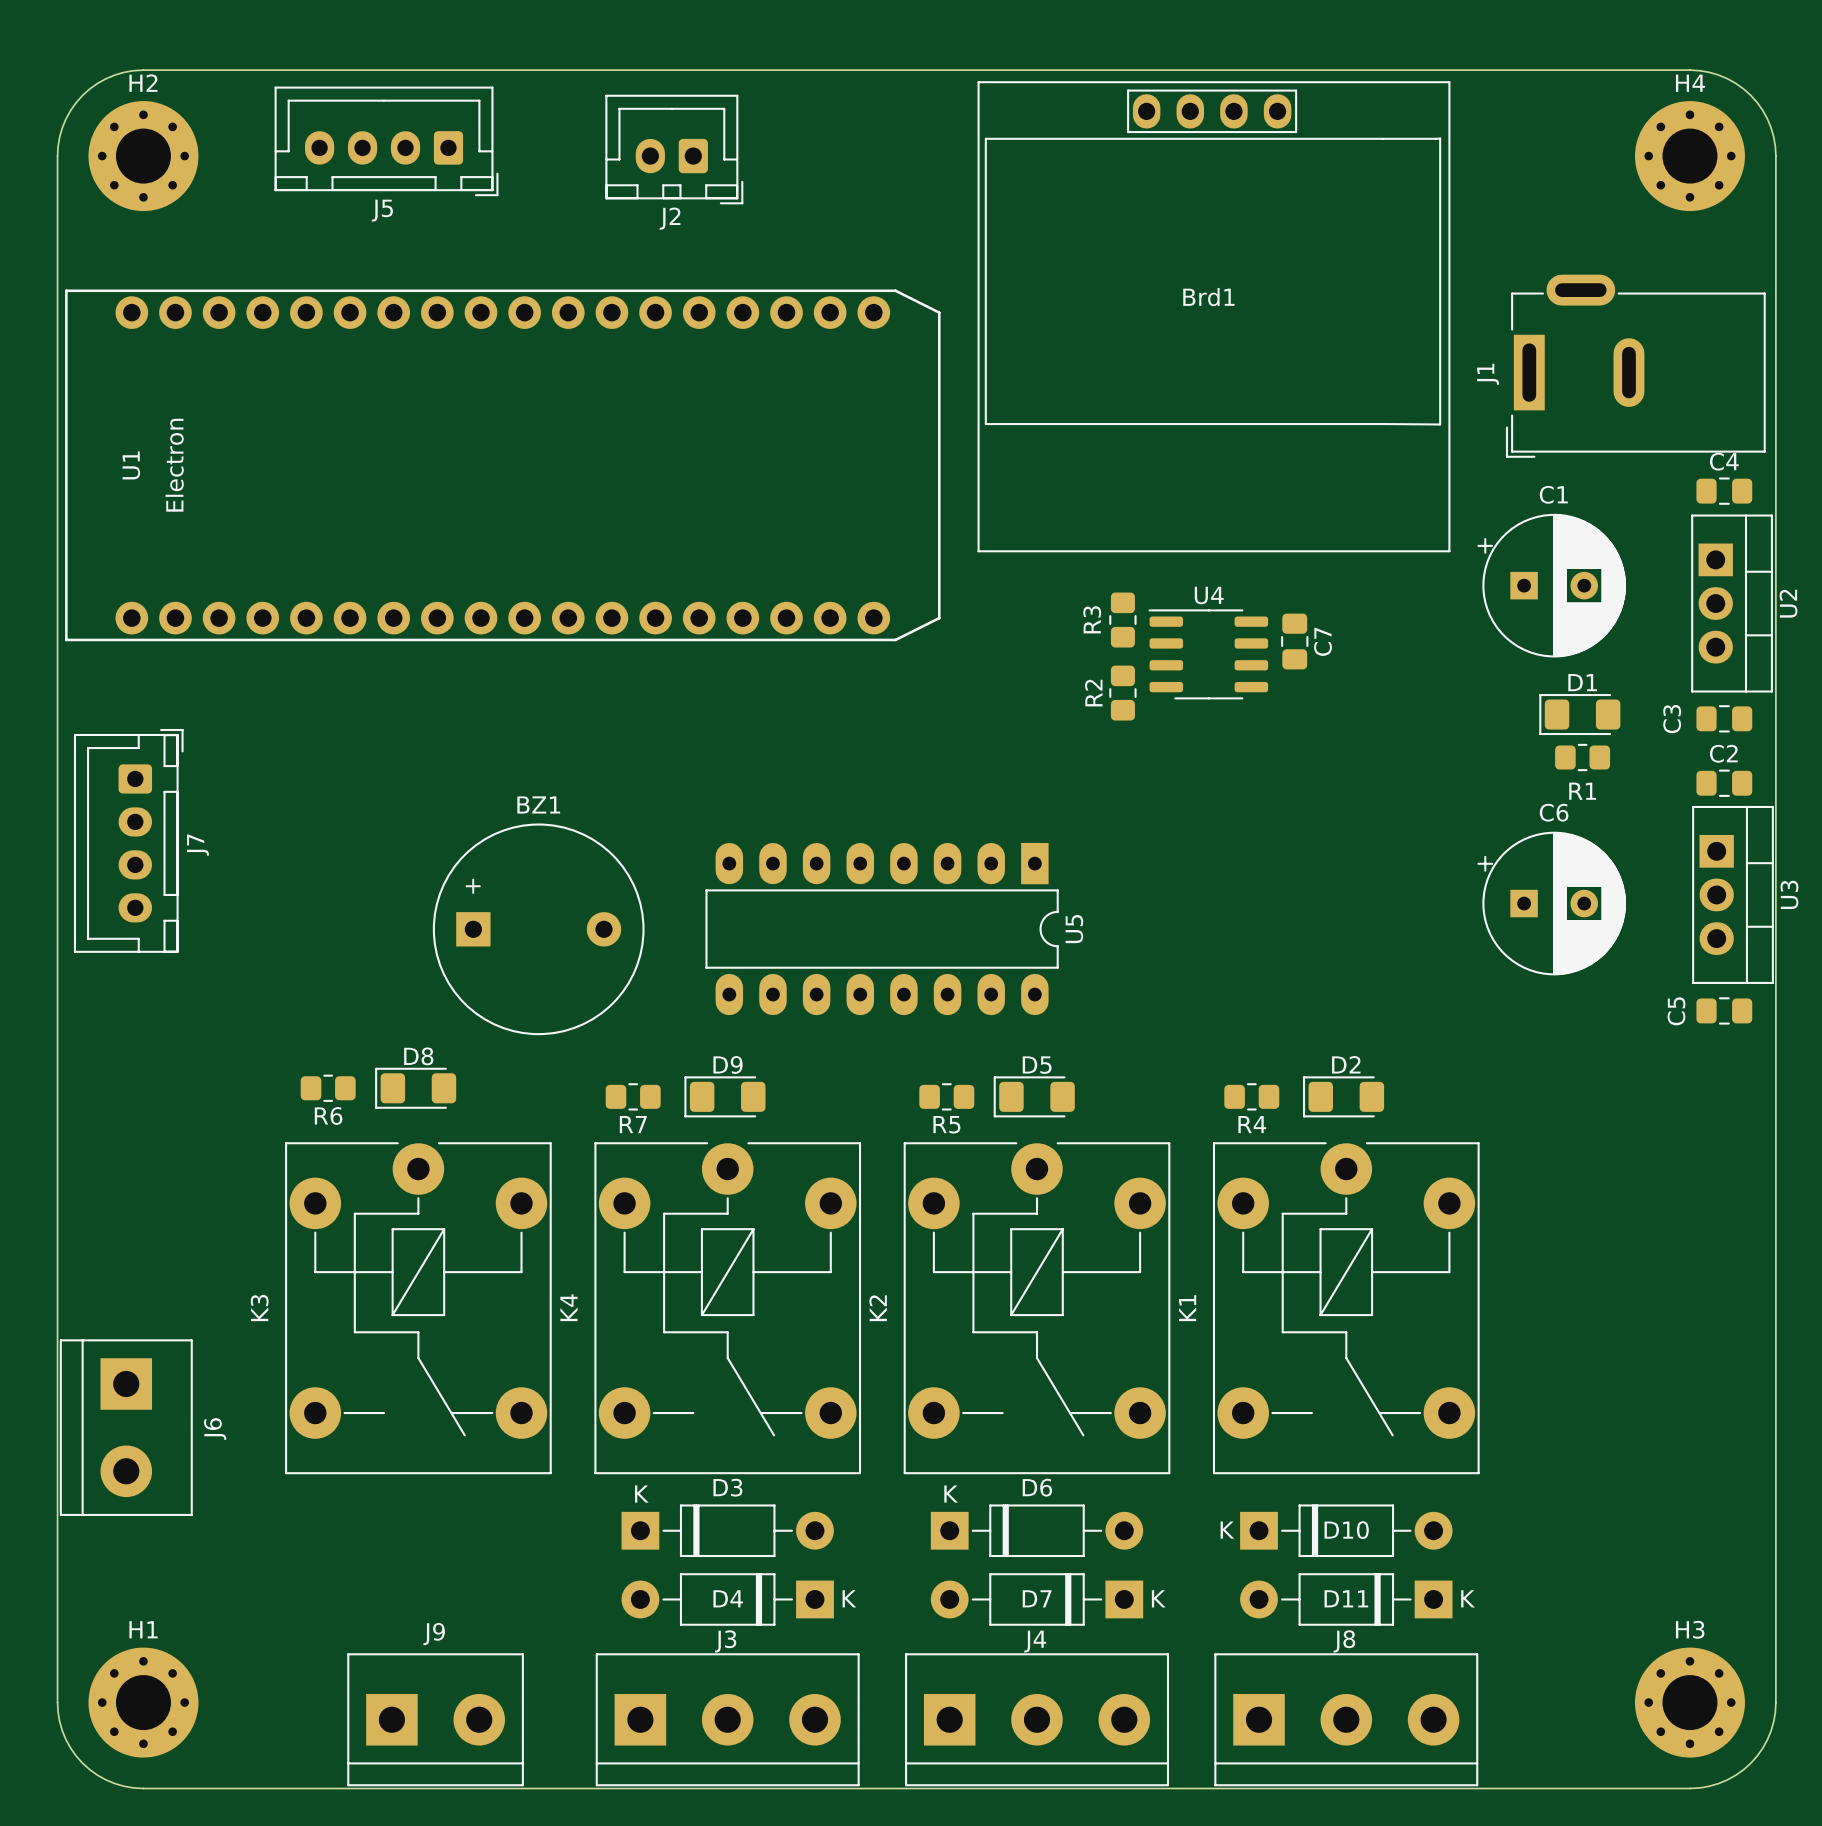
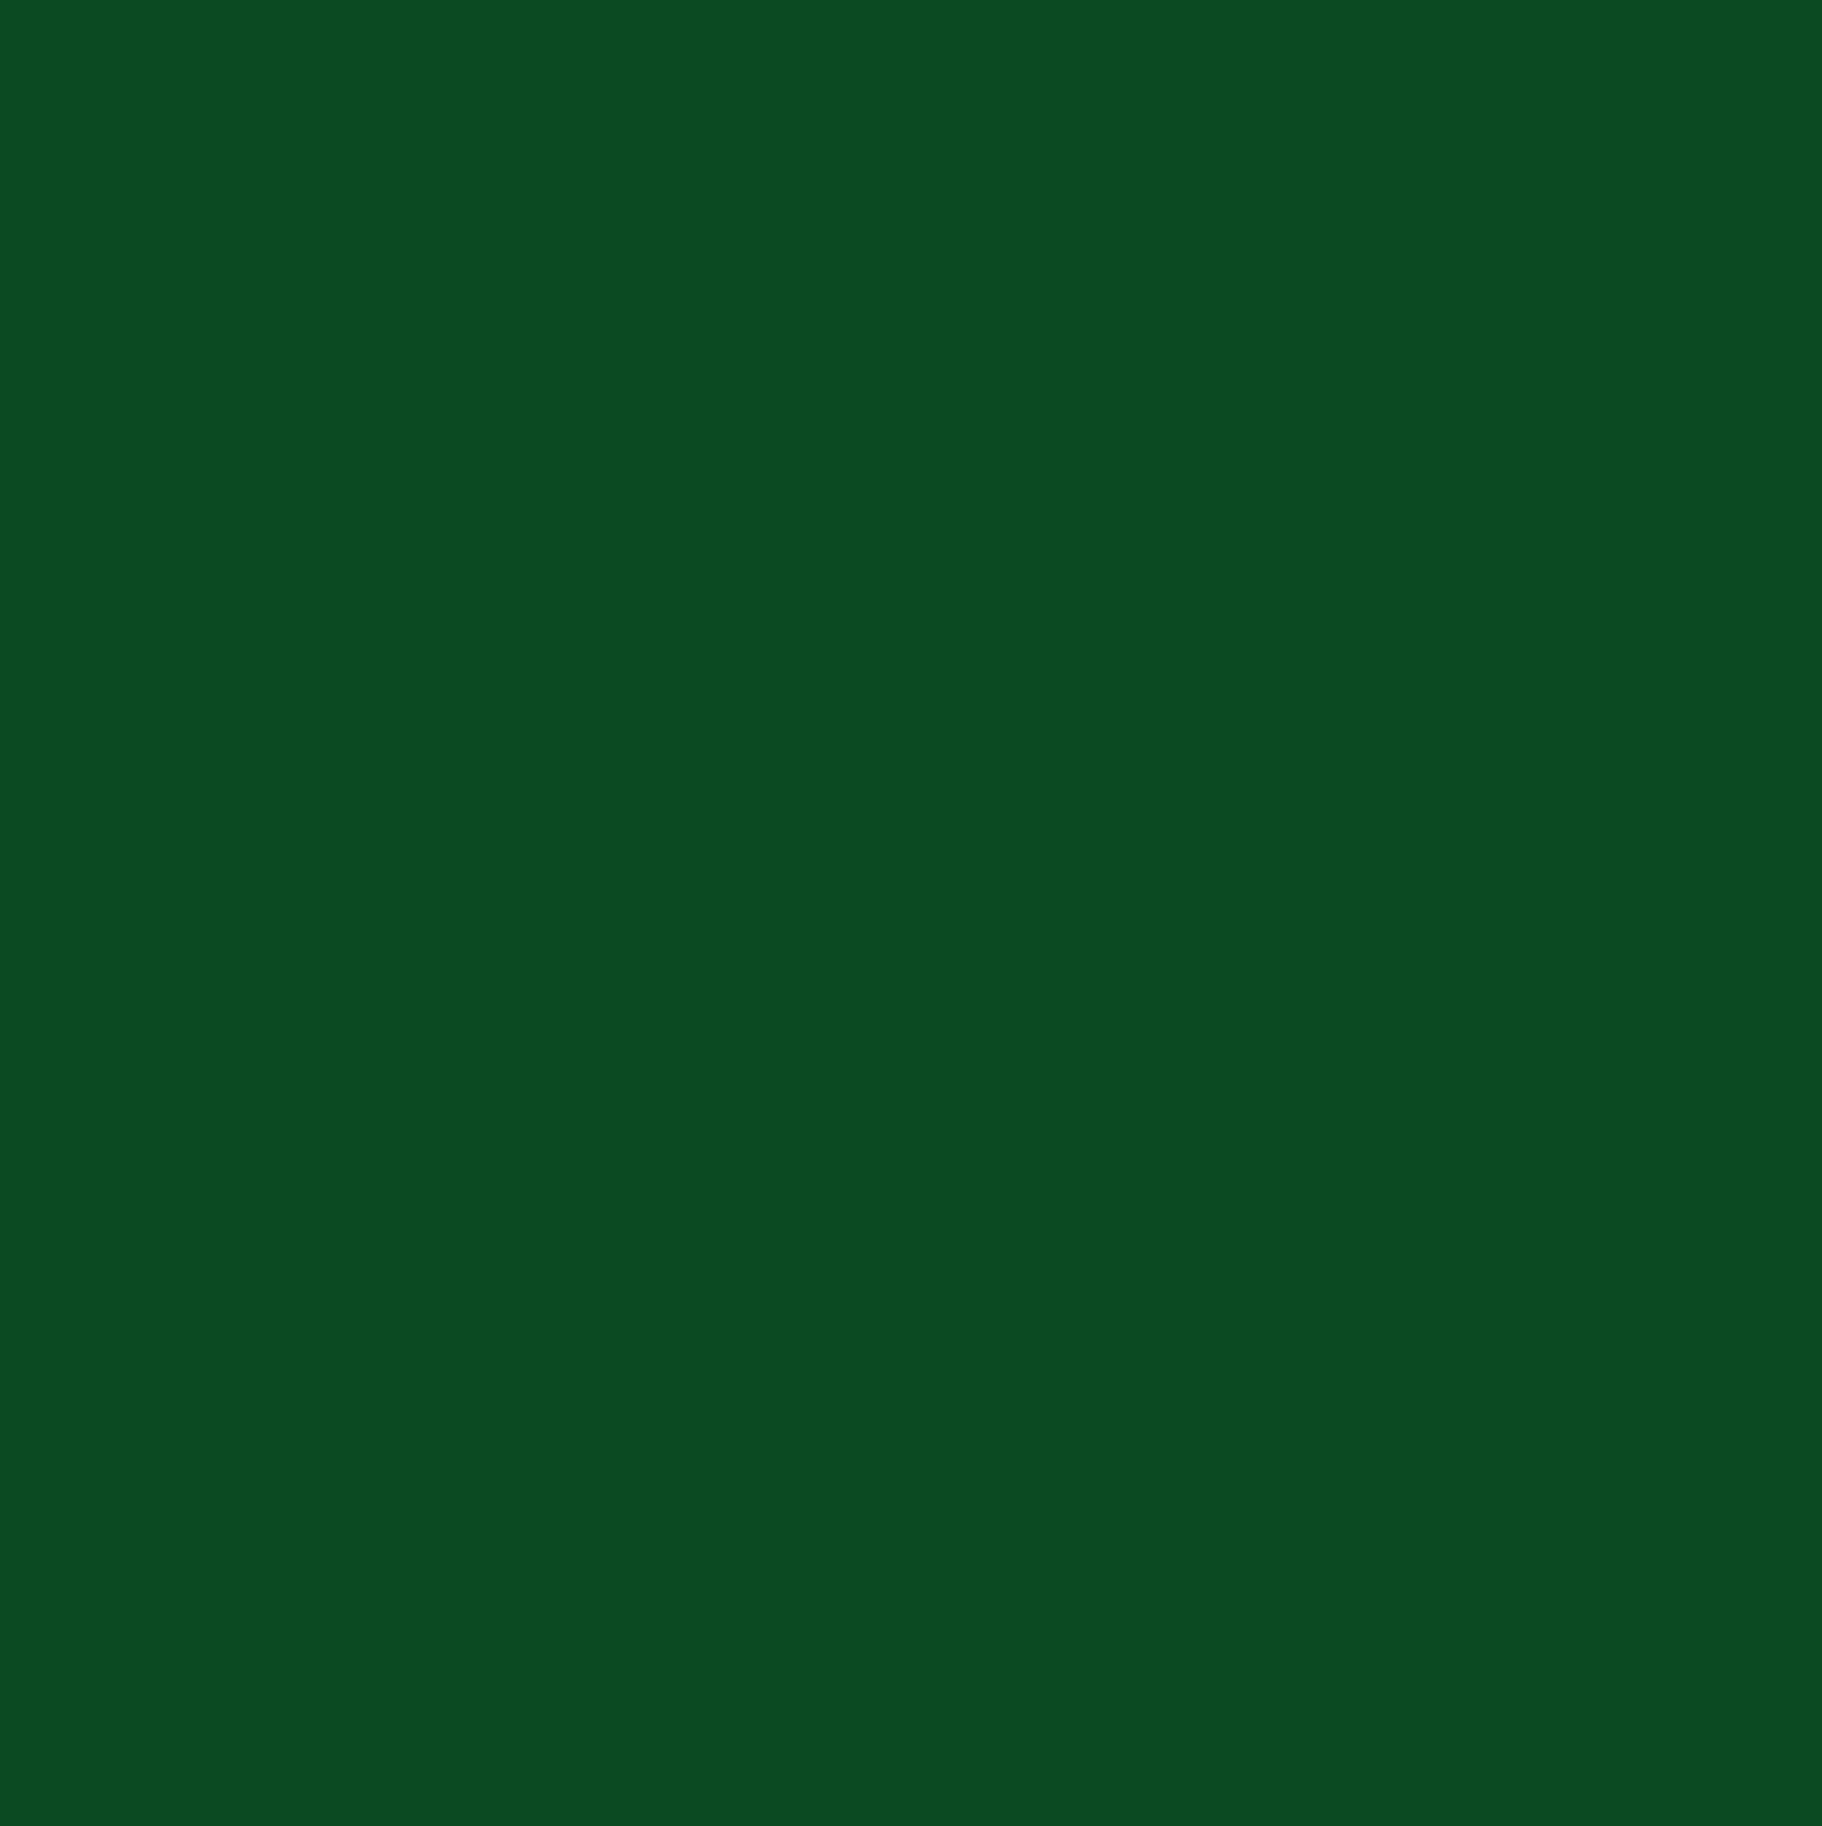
board edge: (143, 70) (1689, 70) (1718, 74) (1735, 83) (1750, 95) (1762, 110) (1771, 127) (1775, 156) (1775, 1702) (1771, 1730) (1762, 1748) (1750, 1763) (1735, 1775) (1718, 1783) (1689, 1788) (143, 1788) (115, 1783) (97, 1775) (82, 1763) (70, 1748) (62, 1730) (57, 1702) (57, 156) (59, 136) (66, 118) (82, 95) (106, 78) (124, 72) (143, 70) -> none
J5: (386, 141) -> none
J2: (674, 149) -> none
H2: (143, 156) -> none
H4: (1689, 156) -> none
Brd1: (1213, 316) -> none
J1: (1635, 366) -> none
U1: Electron (502, 465) -> none
C4: (1724, 491) -> none
C1: (1551, 585) -> none
U2: (1732, 603) -> none
R3: (1122, 620) -> none
C7: (1294, 641) -> none
U4: (1208, 654) -> none
R2: (1122, 693) -> none
D1: (1579, 714) -> none
C3: (1724, 718) -> none
R1: (1582, 757) -> none
C2: (1724, 783) -> none
J7: (128, 840) -> none
U3: (1733, 894) -> none
C6: (1551, 903) -> none
BZ1: (538, 929) -> none
U5: (882, 929) -> none
C5: (1724, 1010) -> none
R6: (328, 1088) -> none
D8: (415, 1088) -> none
R7: (633, 1096) -> none
D9: (724, 1096) -> none
R5: (946, 1096) -> none
D5: (1034, 1096) -> none
R4: (1251, 1096) -> none
D2: (1343, 1096) -> none
K3: (418, 1308) -> none
K4: (727, 1308) -> none
K2: (1037, 1308) -> none
K1: (1346, 1308) -> none
J6: (126, 1427) -> none
D3: (727, 1530) -> none
D6: (1037, 1530) -> none
D10: (1346, 1530) -> none
D4: (727, 1599) -> none
D7: (1037, 1599) -> none
D11: (1346, 1599) -> none
H1: (143, 1702) -> none
H3: (1689, 1702) -> none
J9: (435, 1719) -> none
J3: (727, 1719) -> none
J4: (1037, 1719) -> none
J8: (1346, 1719) -> none

